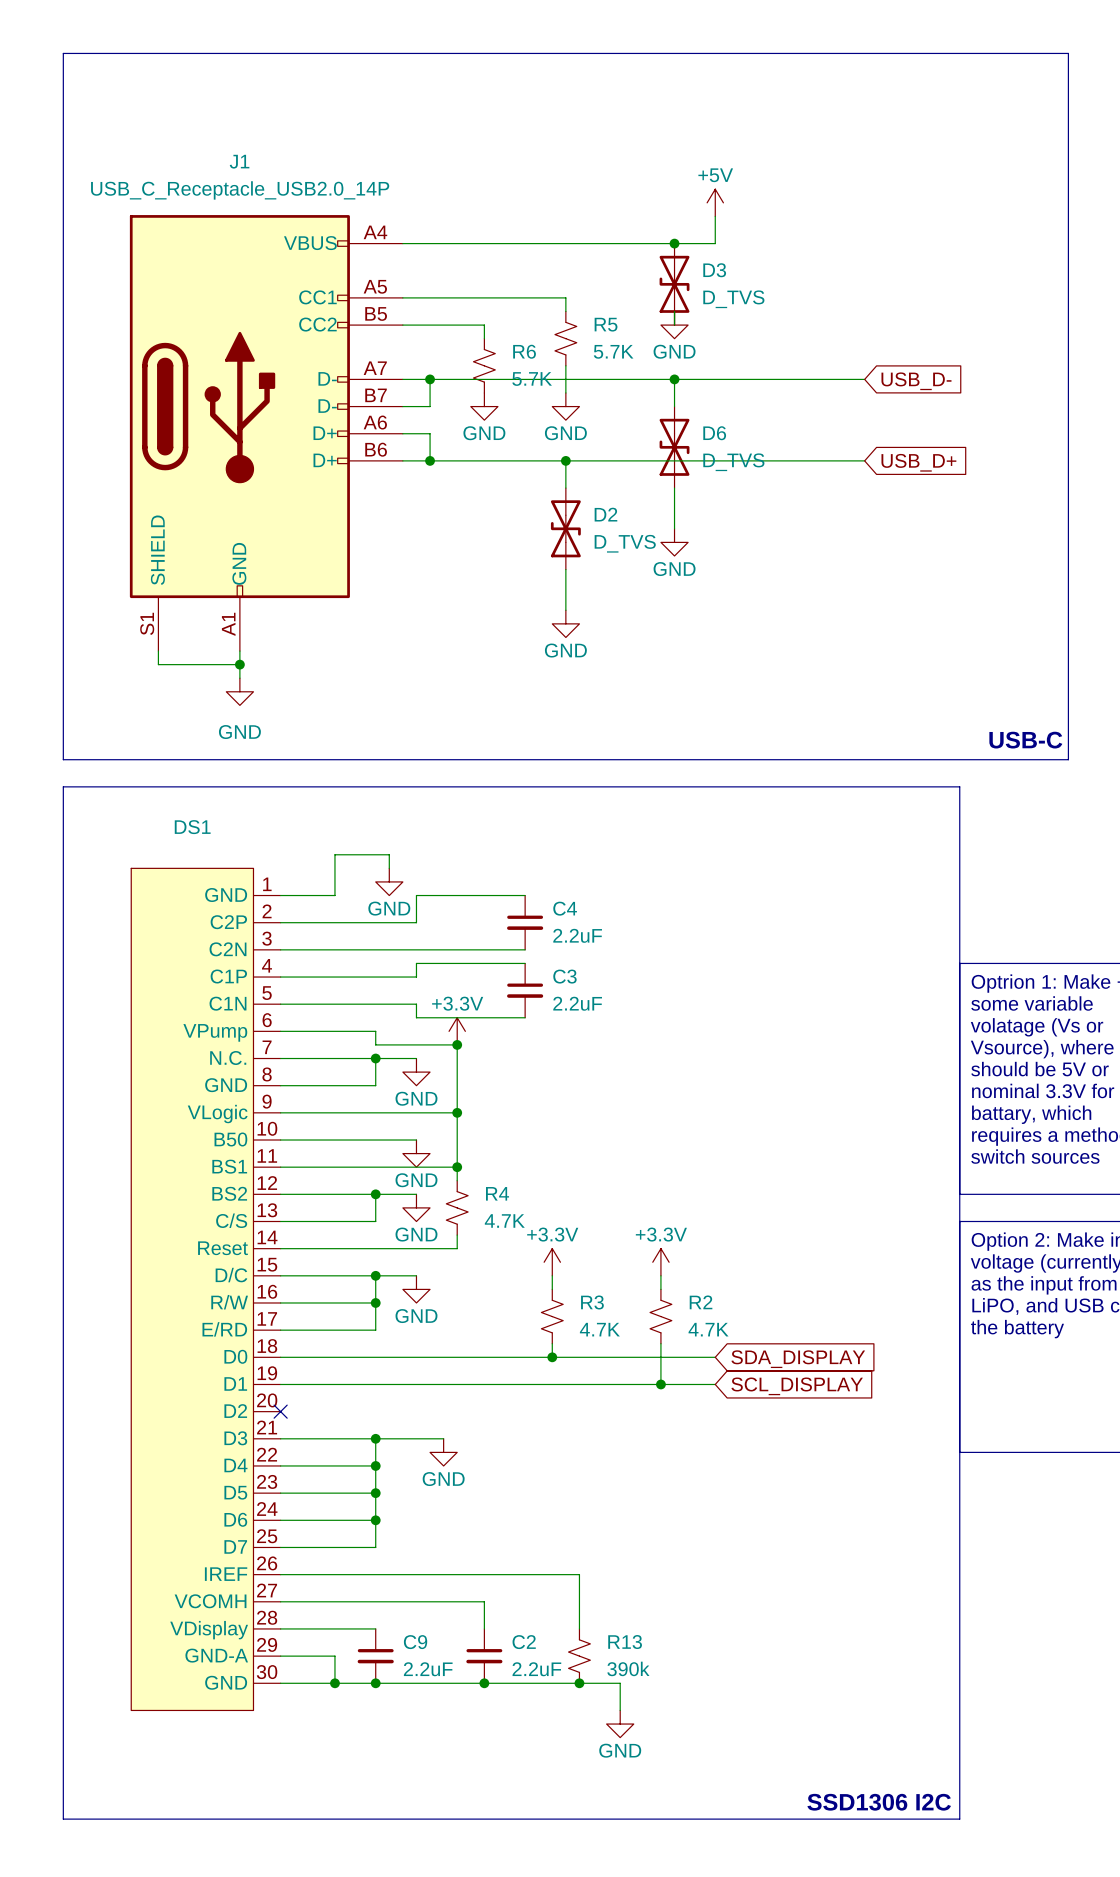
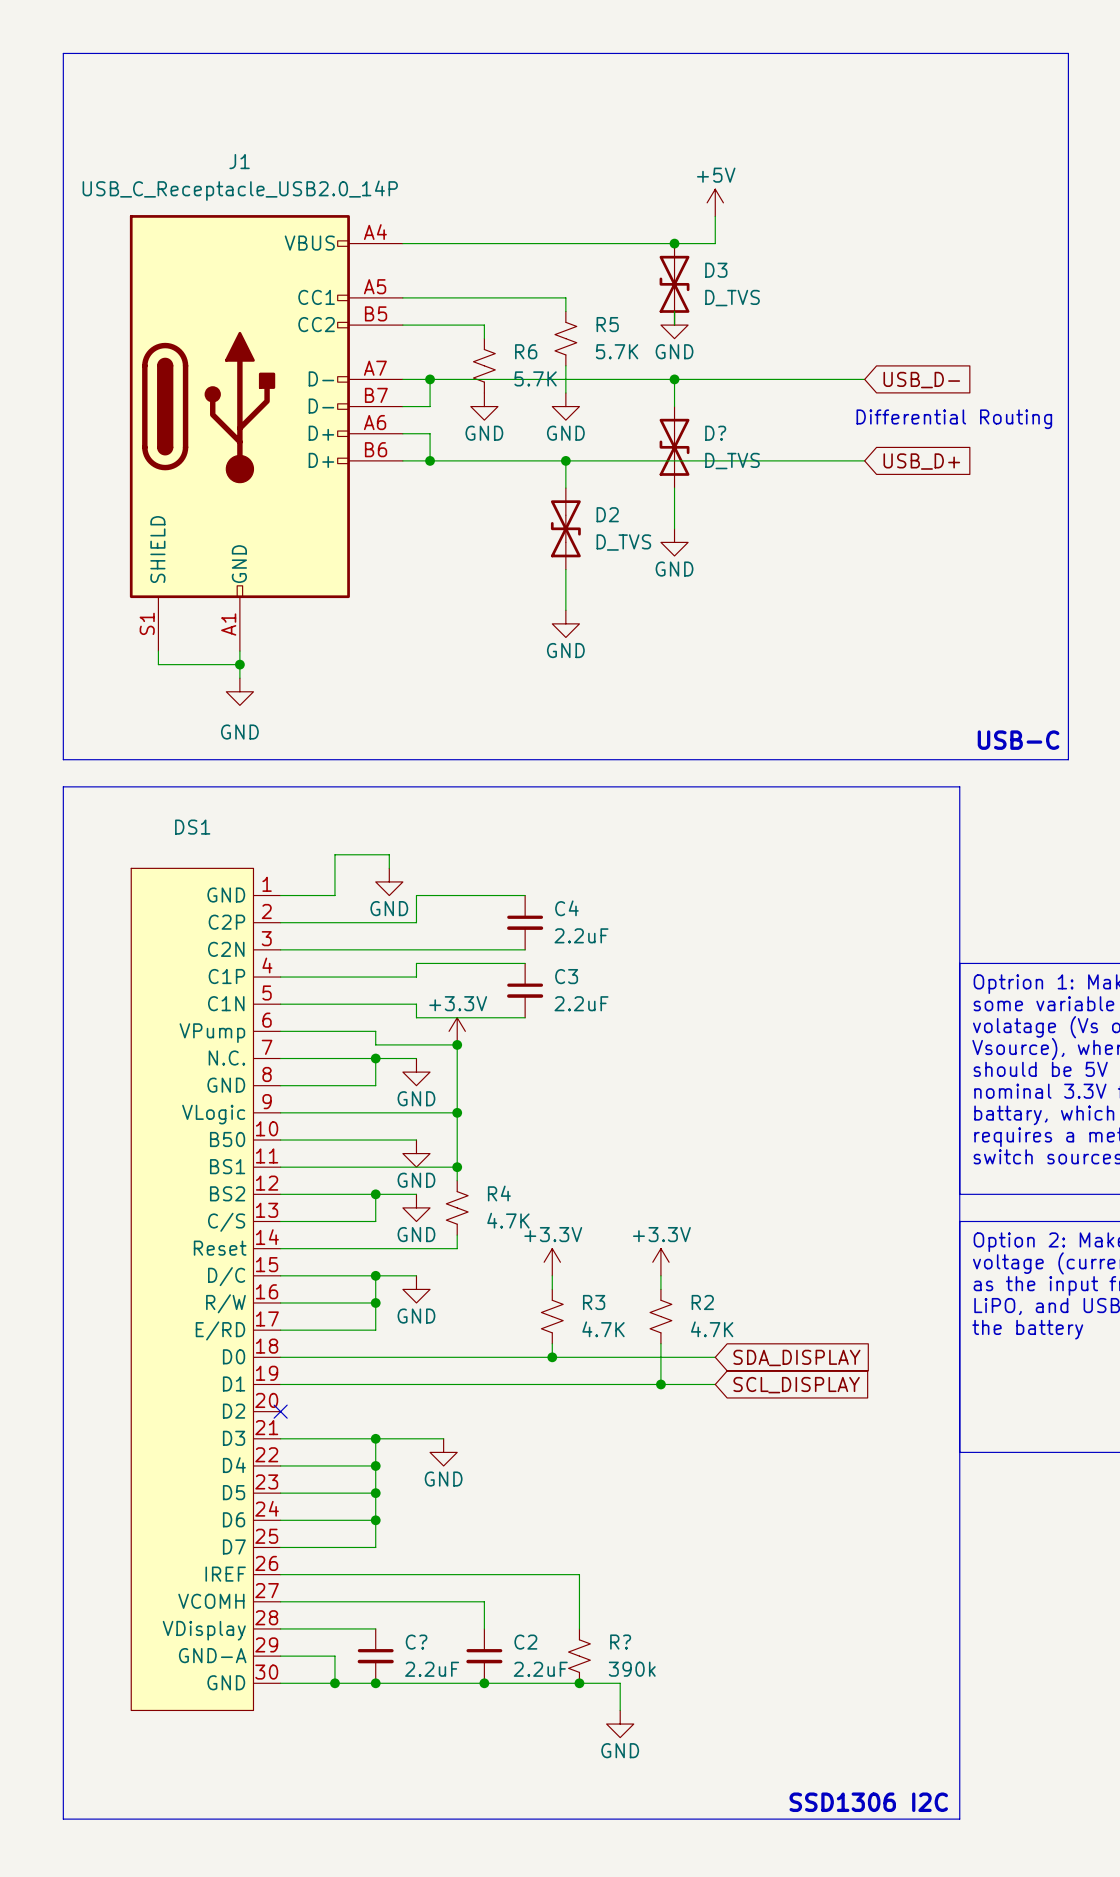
text: none -> Differential Routing (954, 419)
D6 name: D6 (714, 433) -> D? (715, 433)
C9 name: C9 (415, 1642) -> C? (416, 1642)
R13 name: R13 (625, 1642) -> R? (620, 1642)

